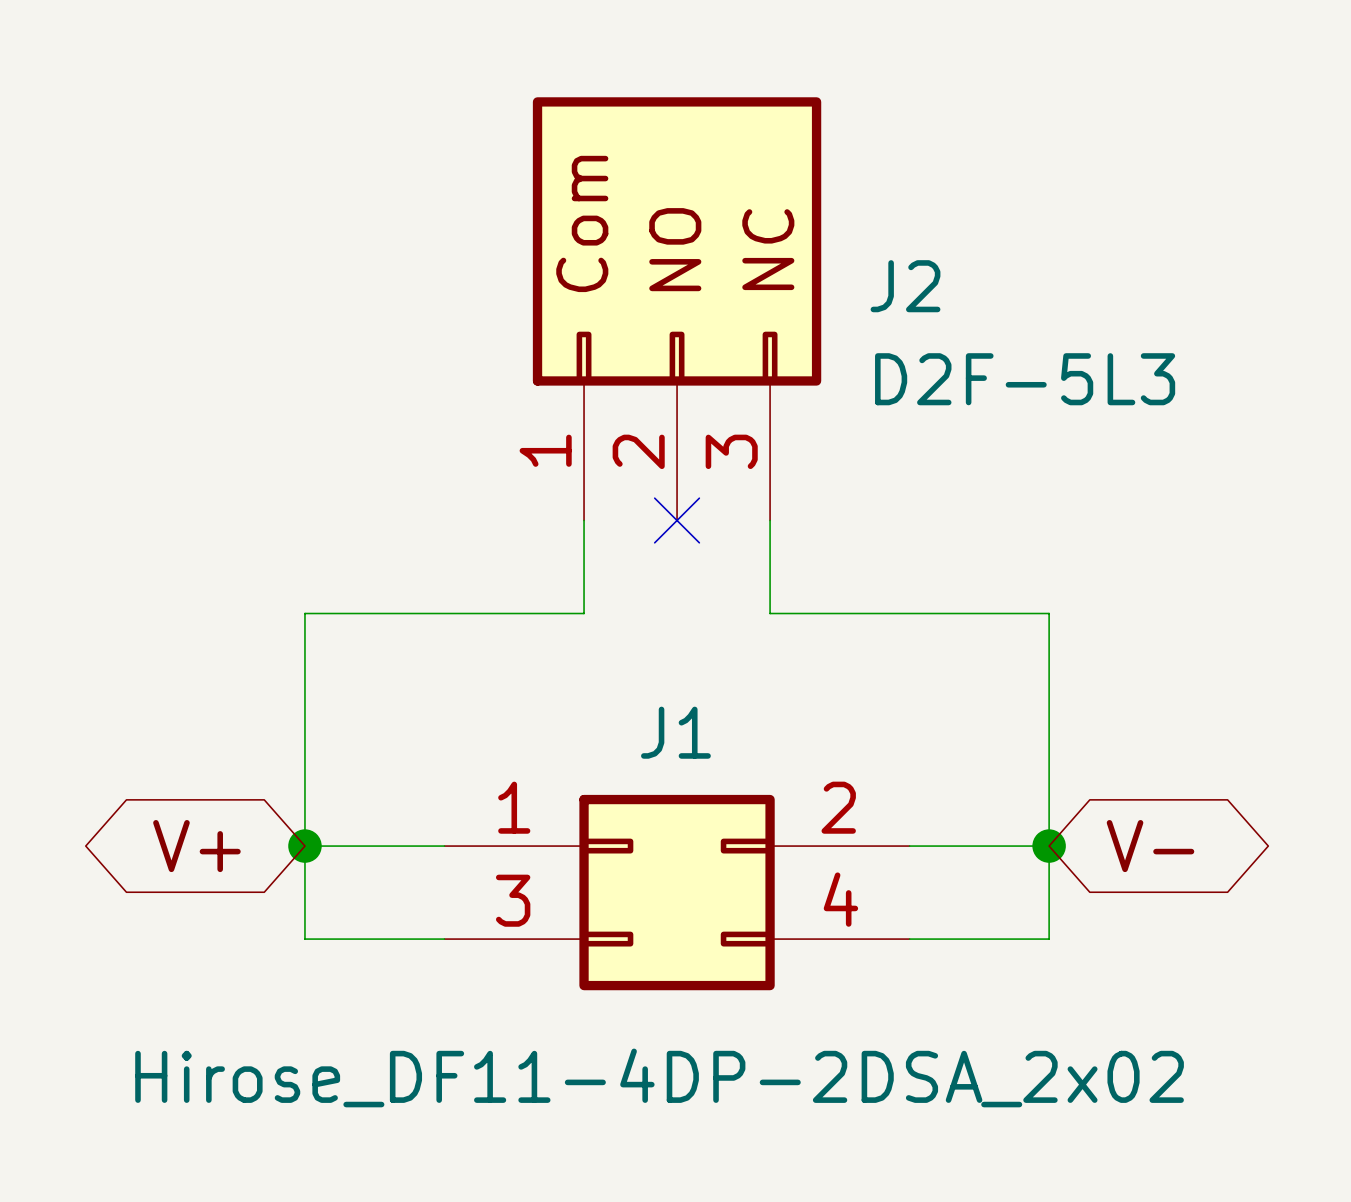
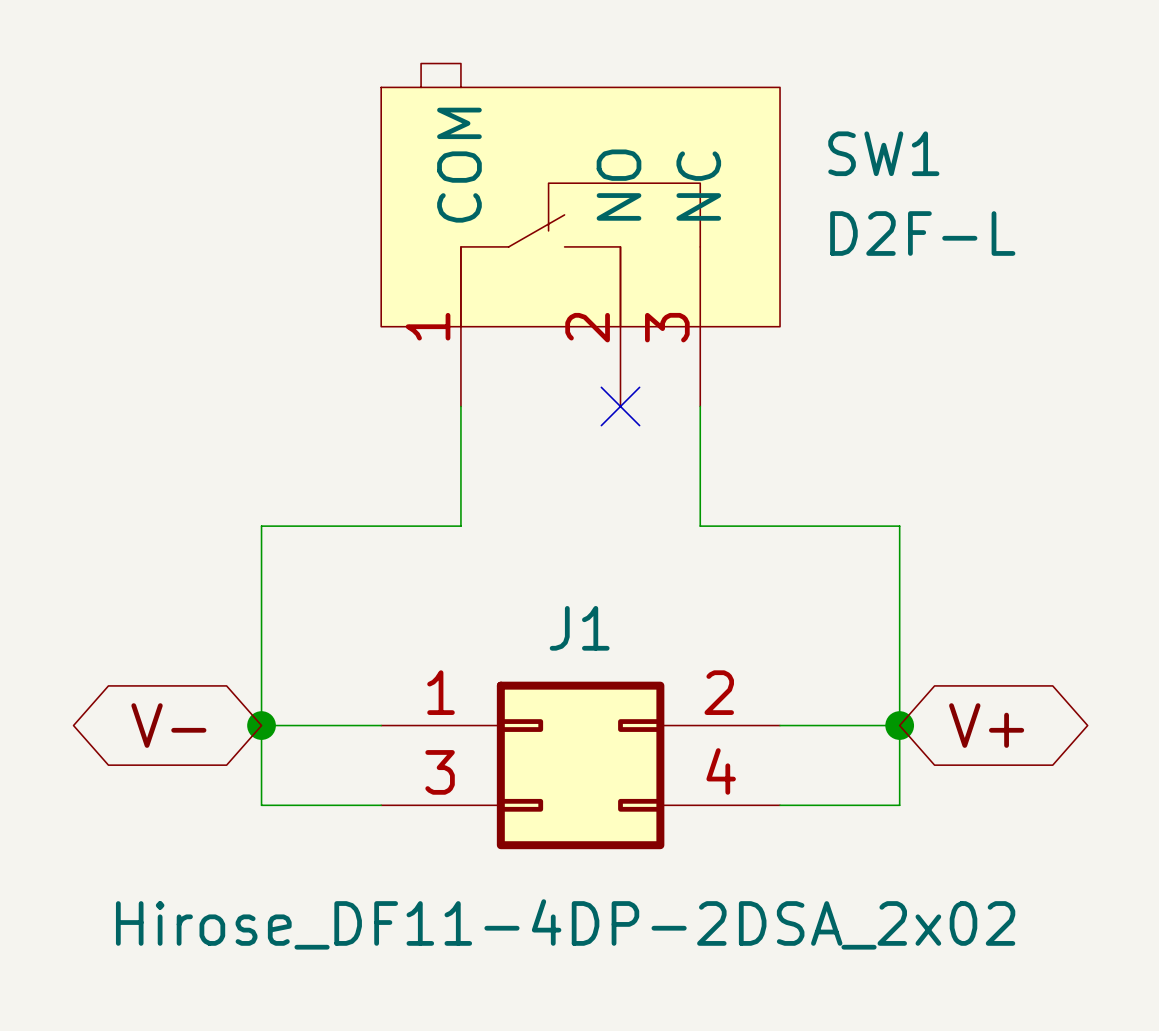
SW1: none -> D2F-L (580, 235)
J2: D2F-5L3 (677, 308) -> none
wire: (584, 520) (584, 613) (537, 613) -> (460, 406) (460, 526)
no-connect mark position: (677, 520) -> (620, 406)
wire: (770, 520) (770, 613) (816, 613) -> (700, 406) (700, 526)
global label: V+ (196, 846) -> V- (168, 725)
global label: V- (1150, 846) -> V+ (986, 725)

